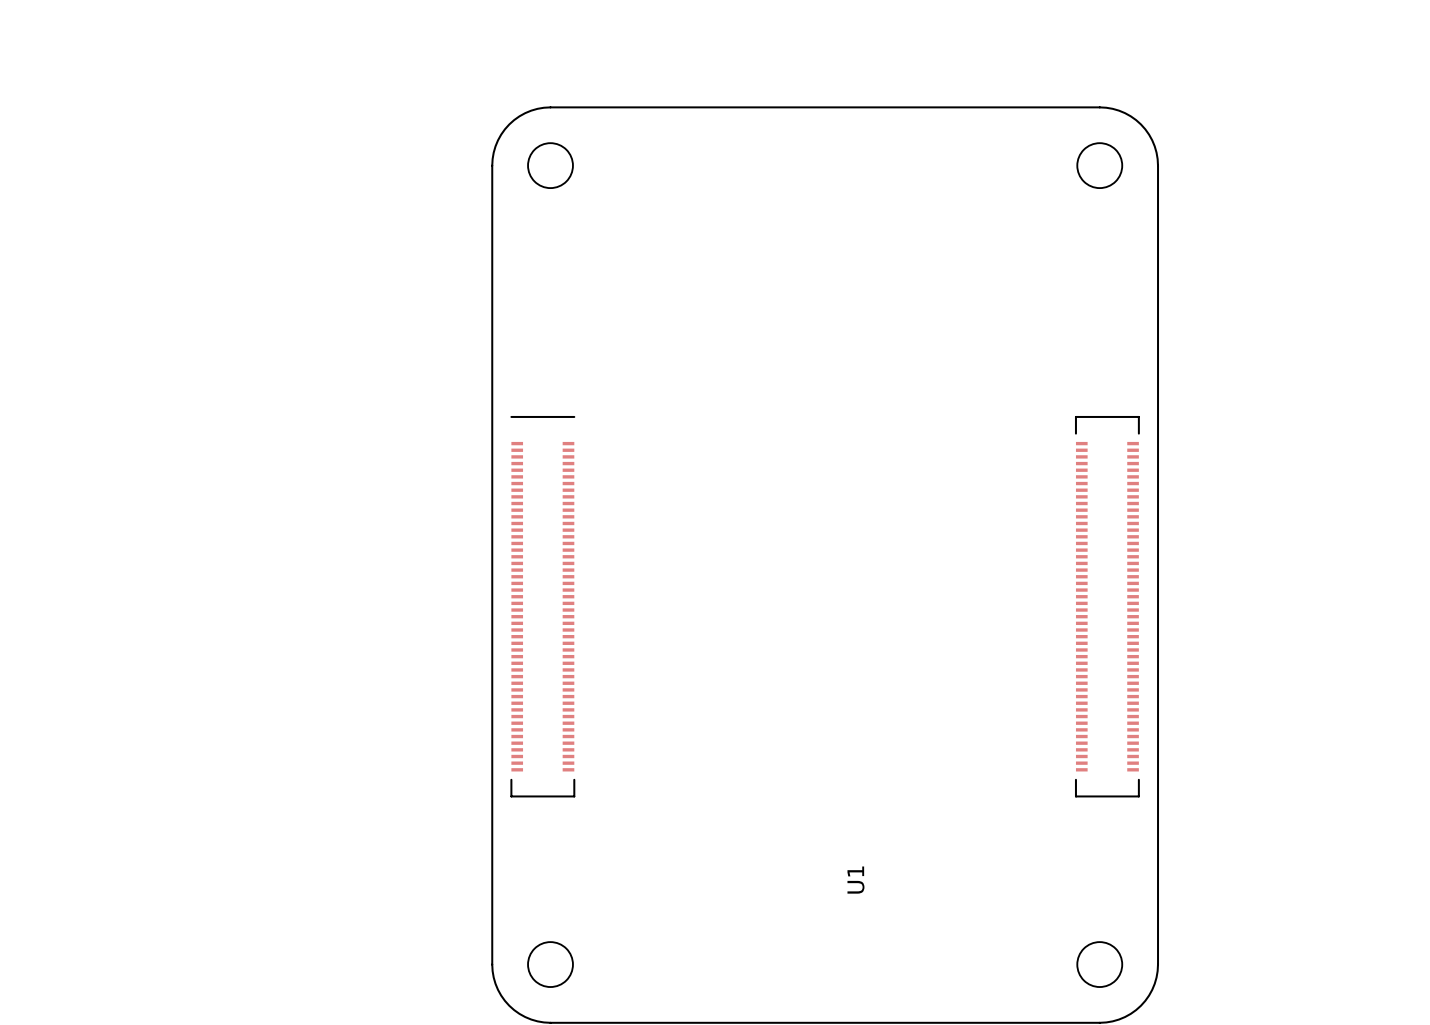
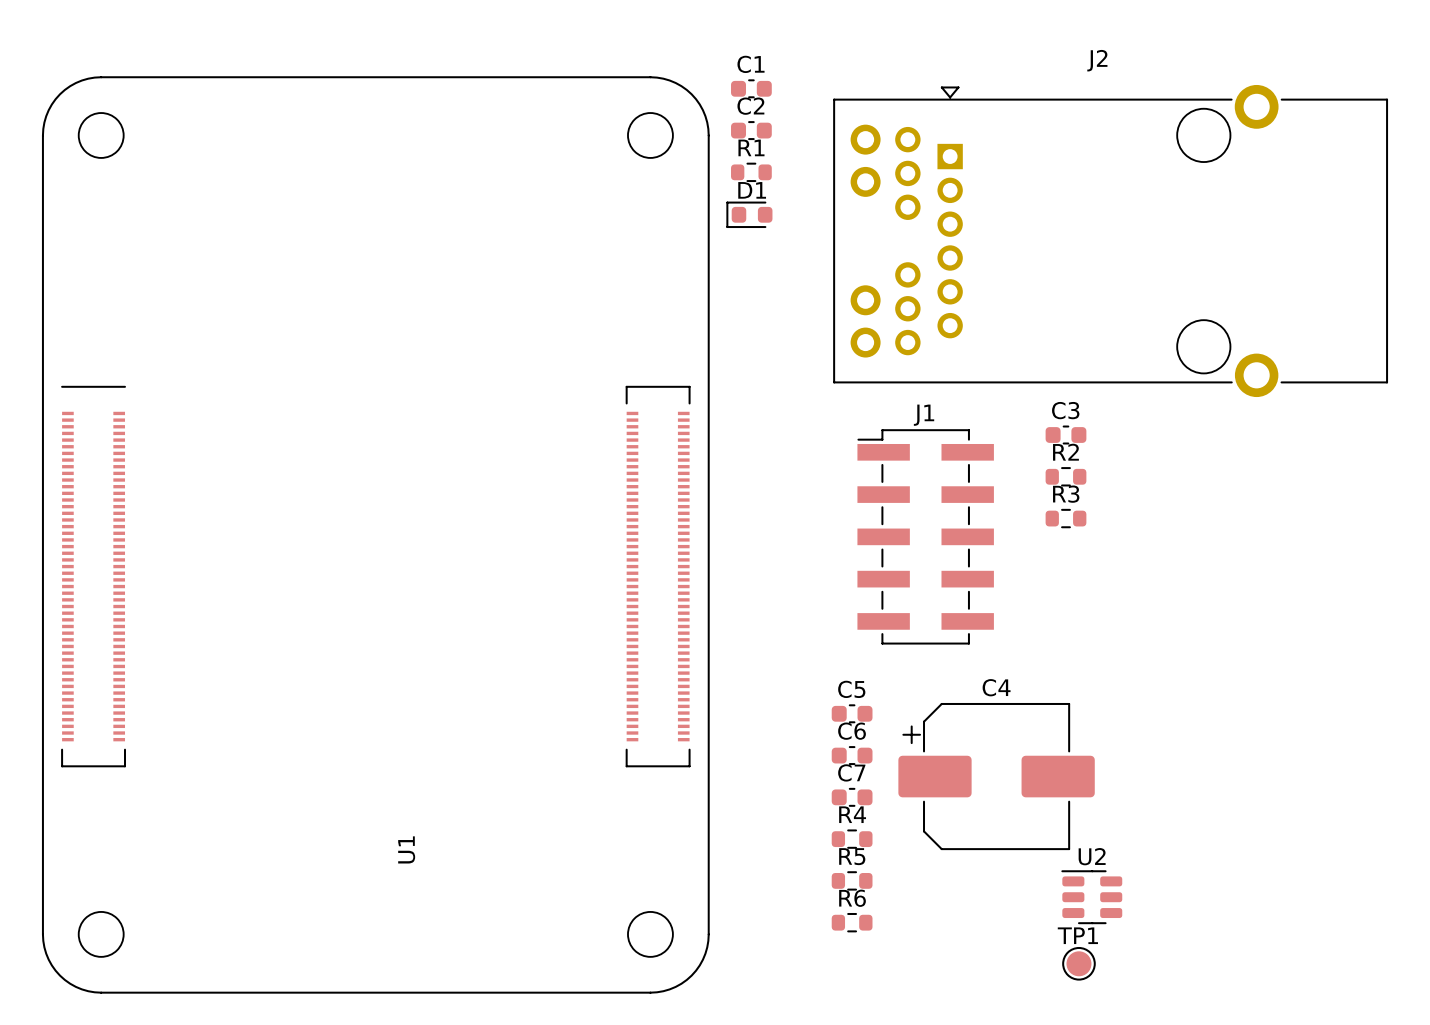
C1: none -> (751, 88)
C2: none -> (751, 130)
R1: none -> (751, 172)
D1: none -> (749, 214)
J2: none -> (1110, 241)
C3: none -> (1065, 435)
R2: none -> (1065, 476)
R3: none -> (1065, 518)
J1: none -> (925, 536)
U1 position: (825, 565) -> (375, 534)
C5: none -> (852, 713)
C6: none -> (852, 755)
C4: none -> (996, 776)
C7: none -> (852, 797)
R4: none -> (852, 839)
R5: none -> (852, 880)
U2: none -> (1091, 897)
R6: none -> (852, 922)
TP1: none -> (1078, 963)

